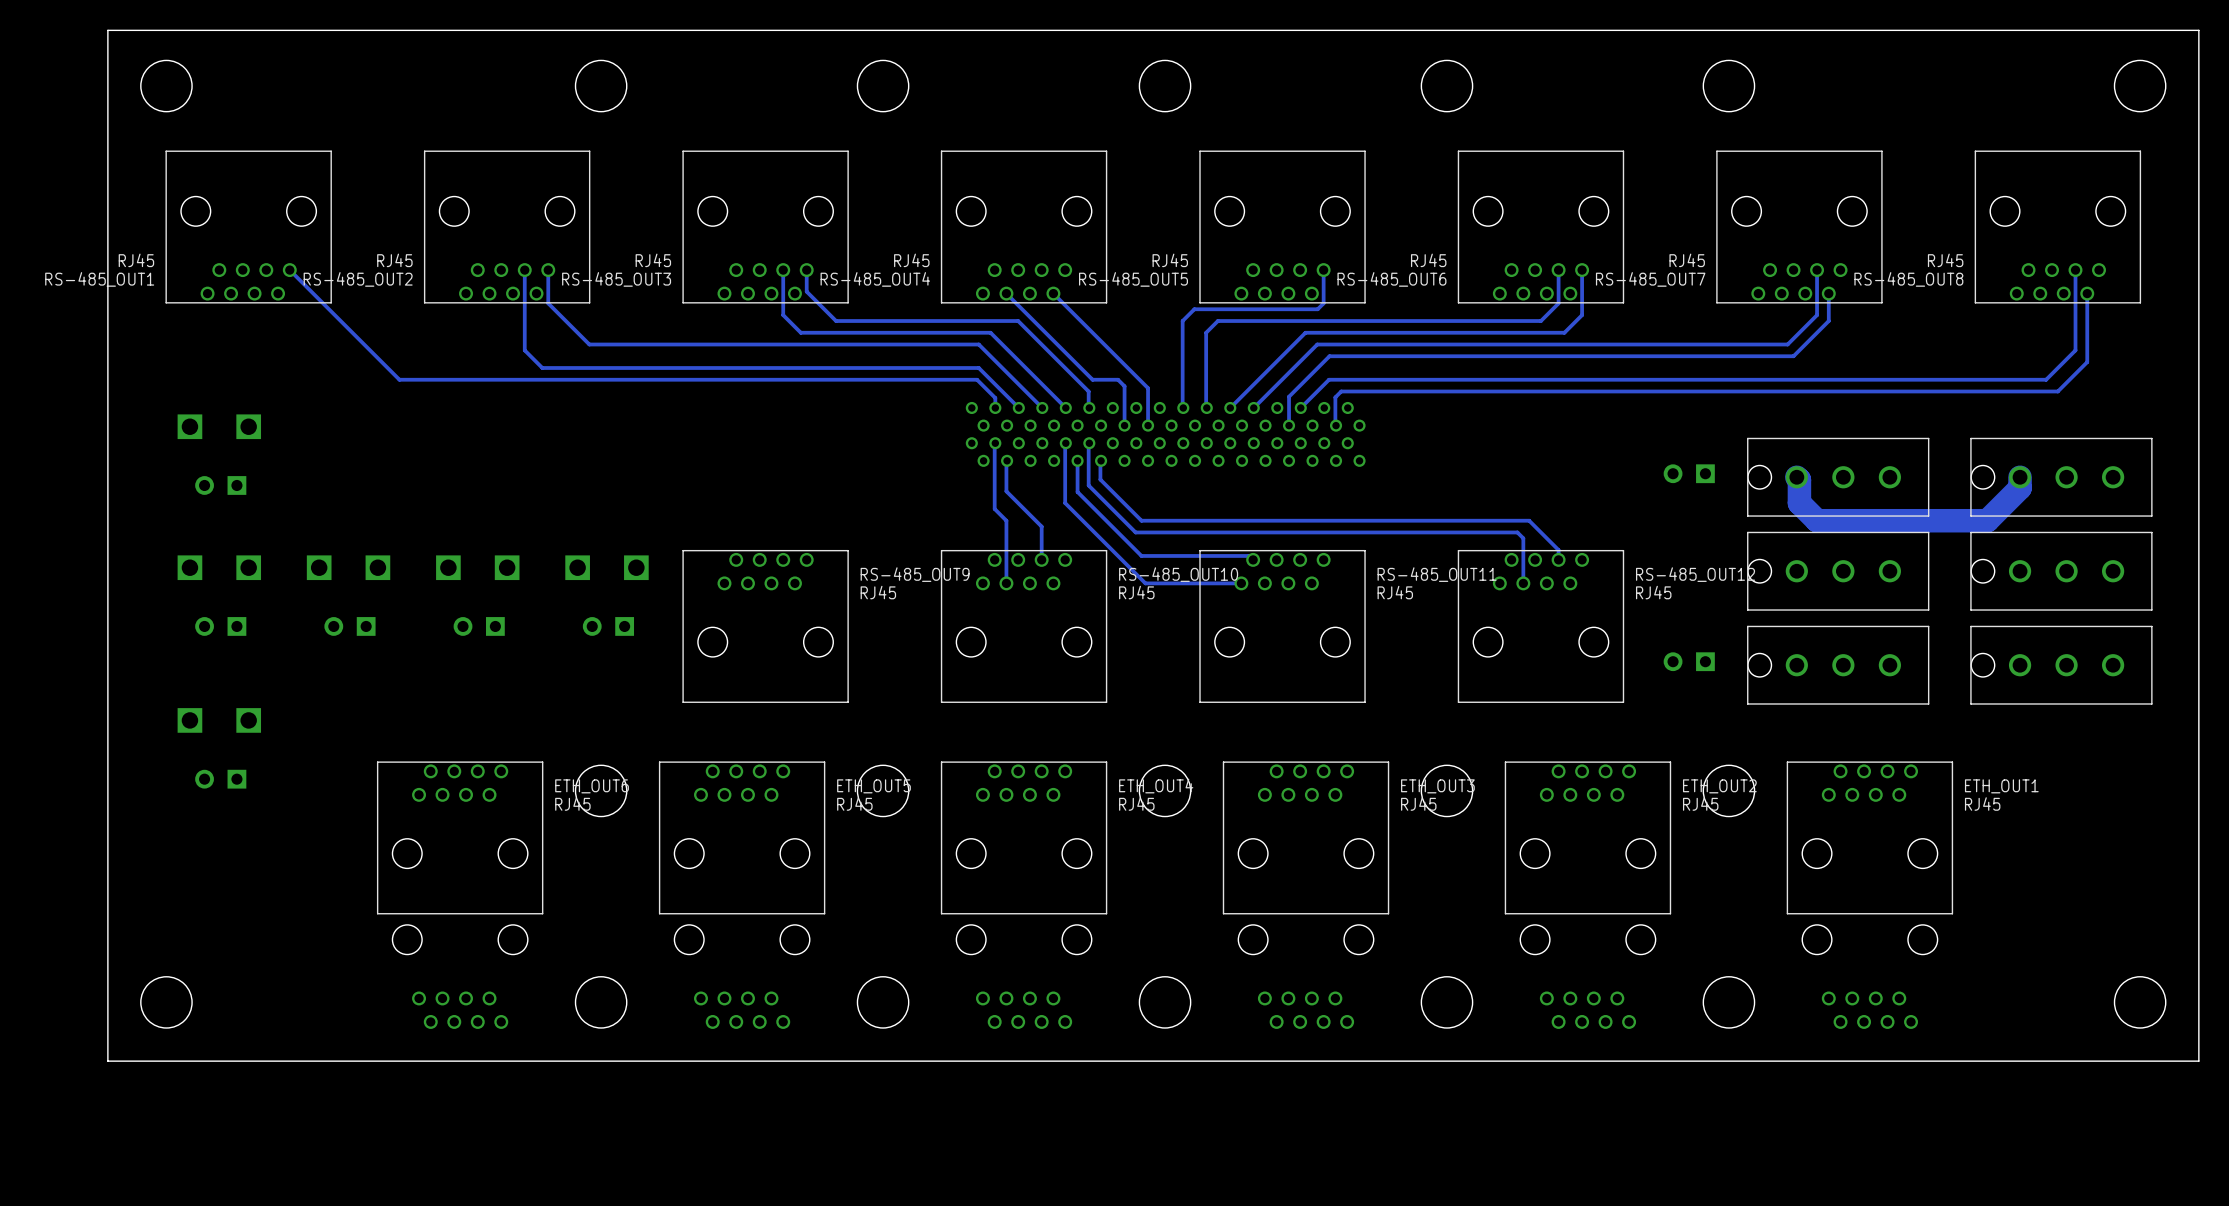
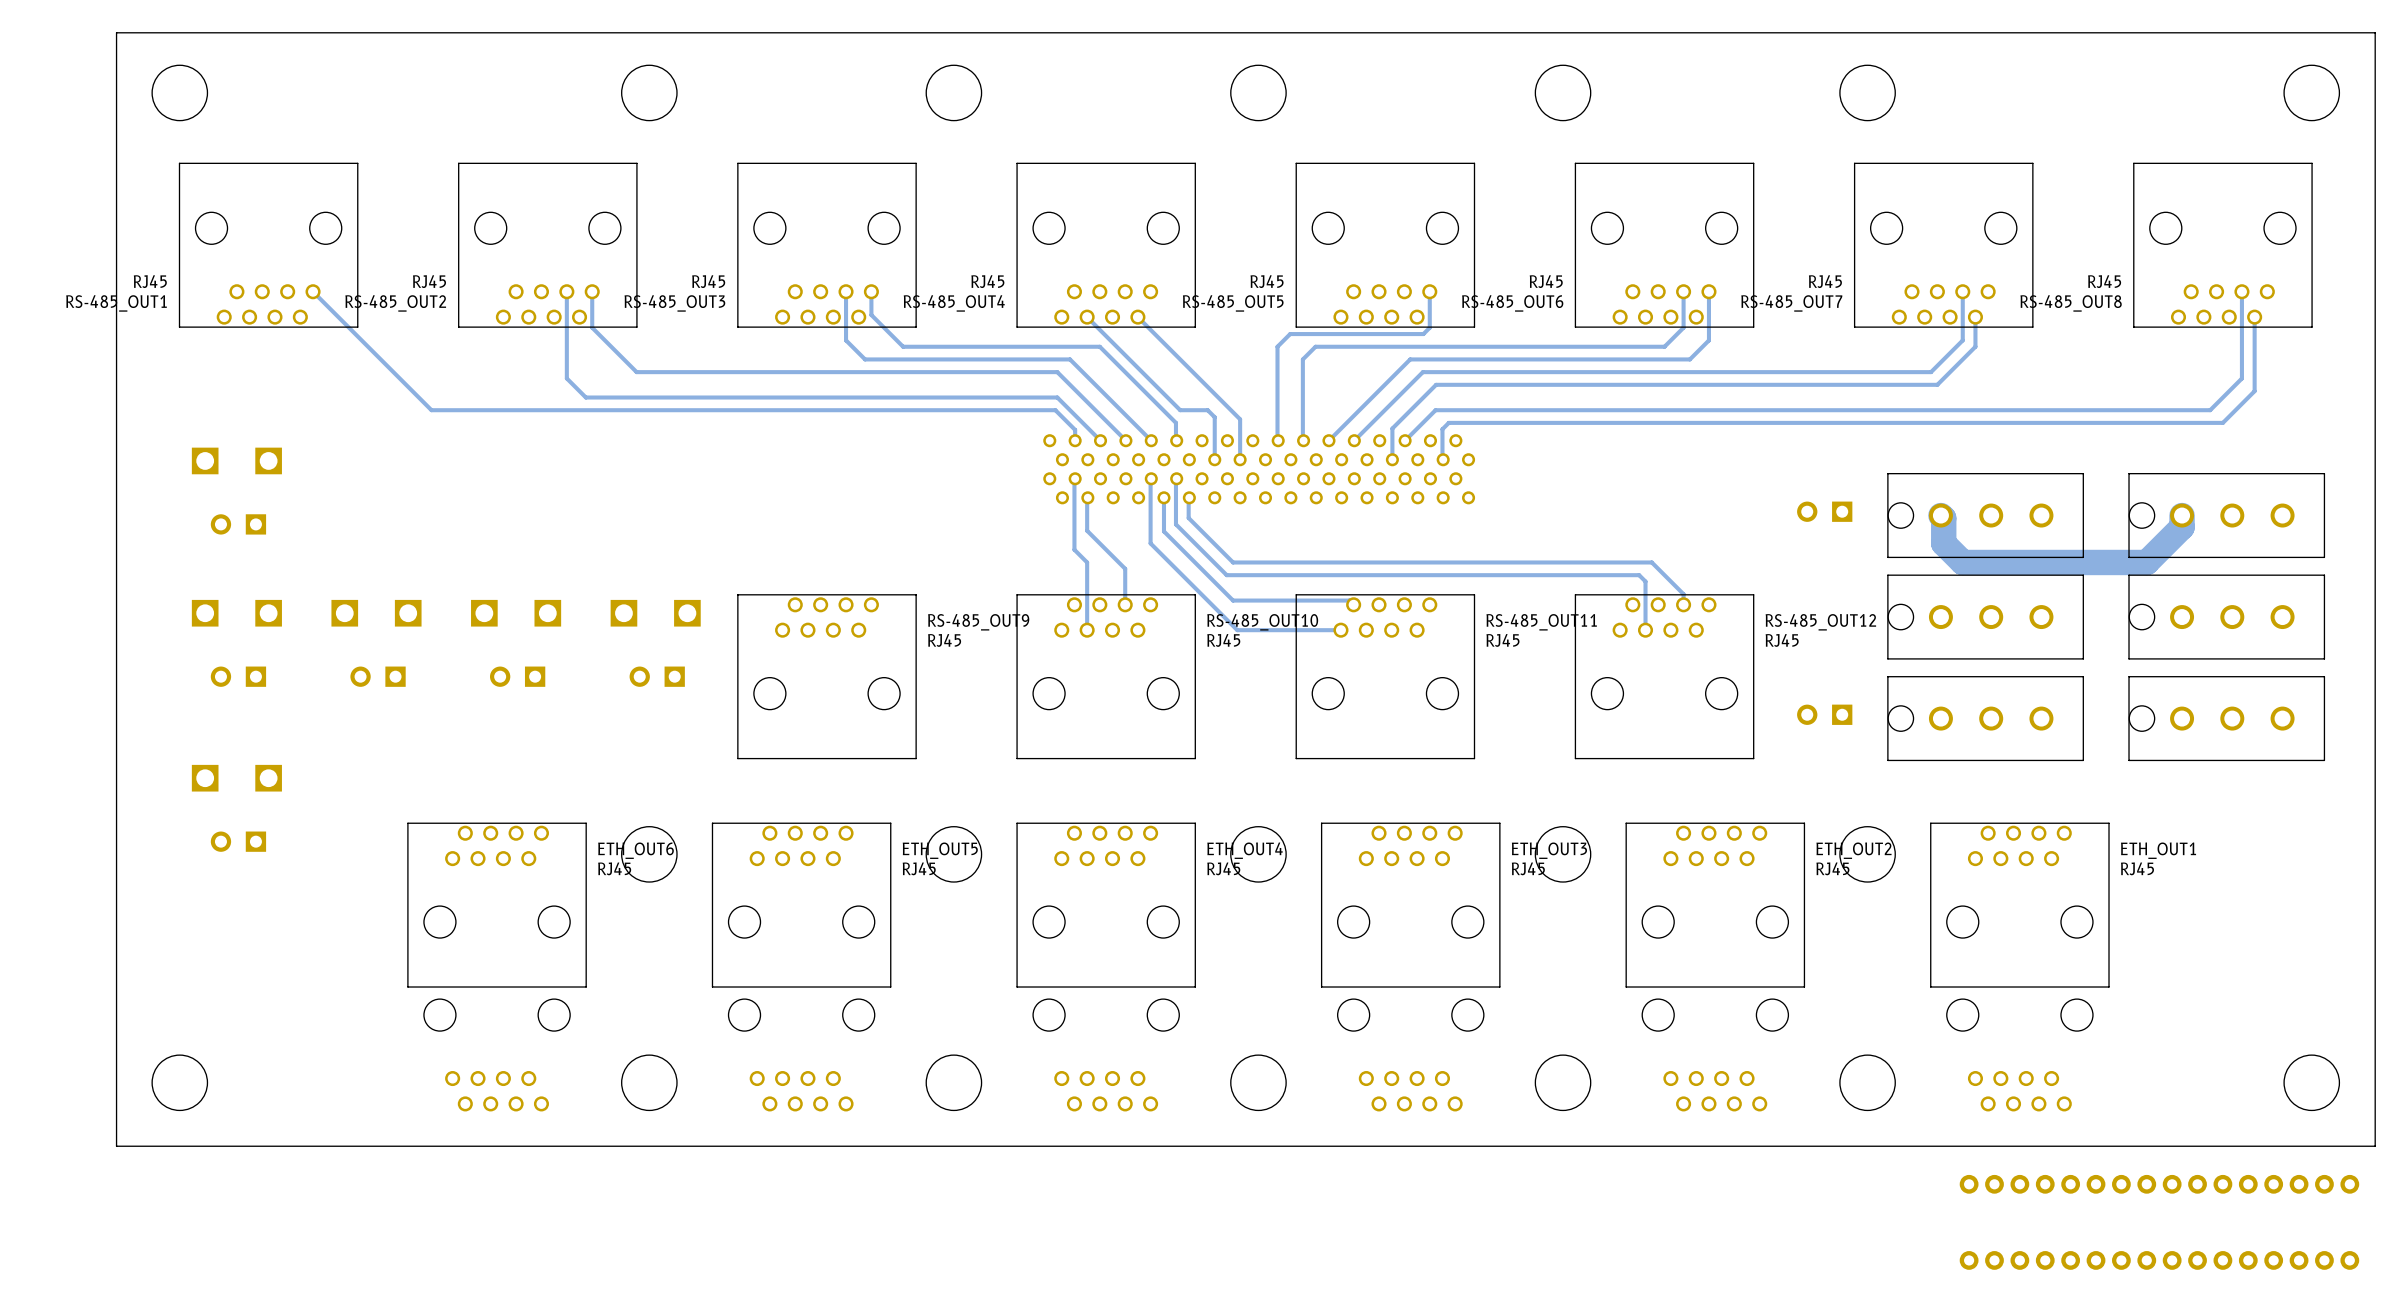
part: none -> (2159, 1184)
part: none -> (2159, 1260)

